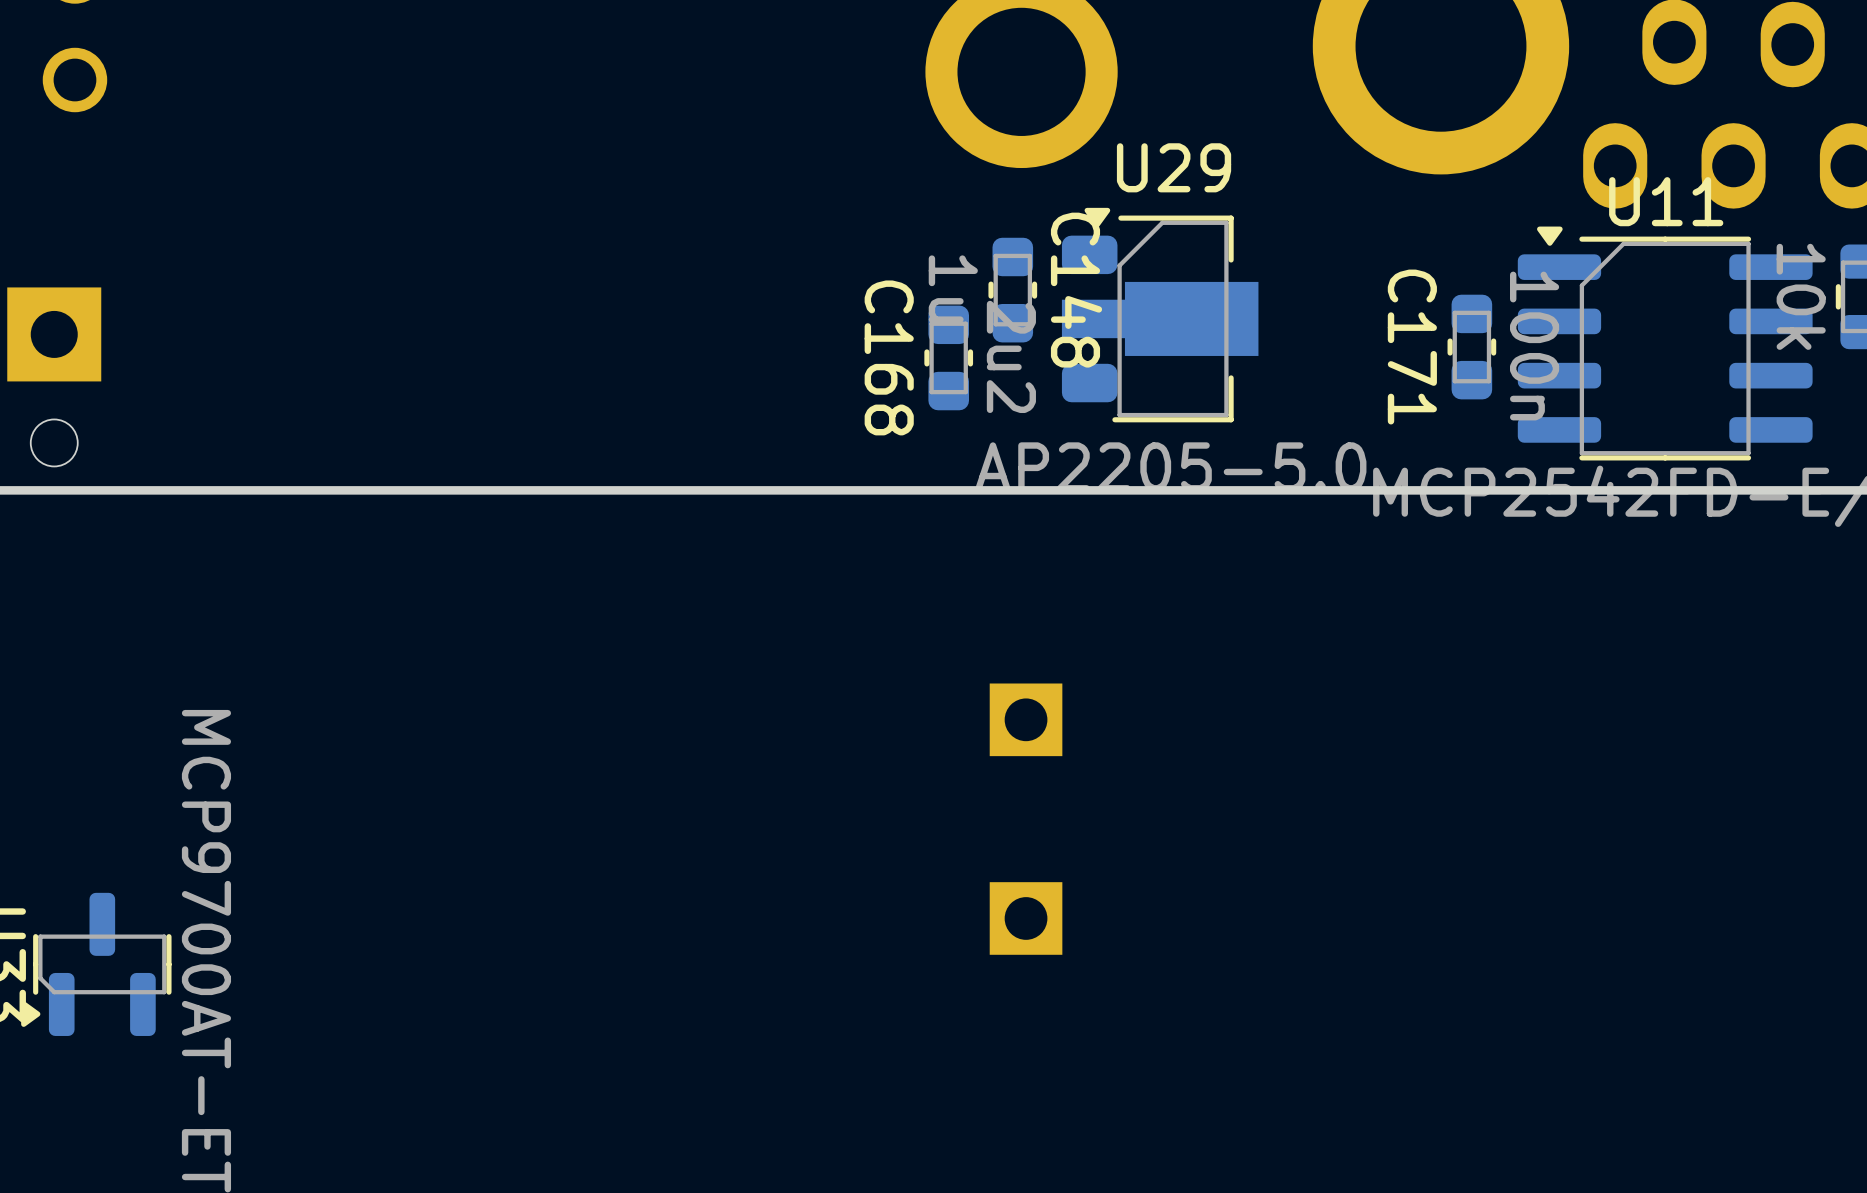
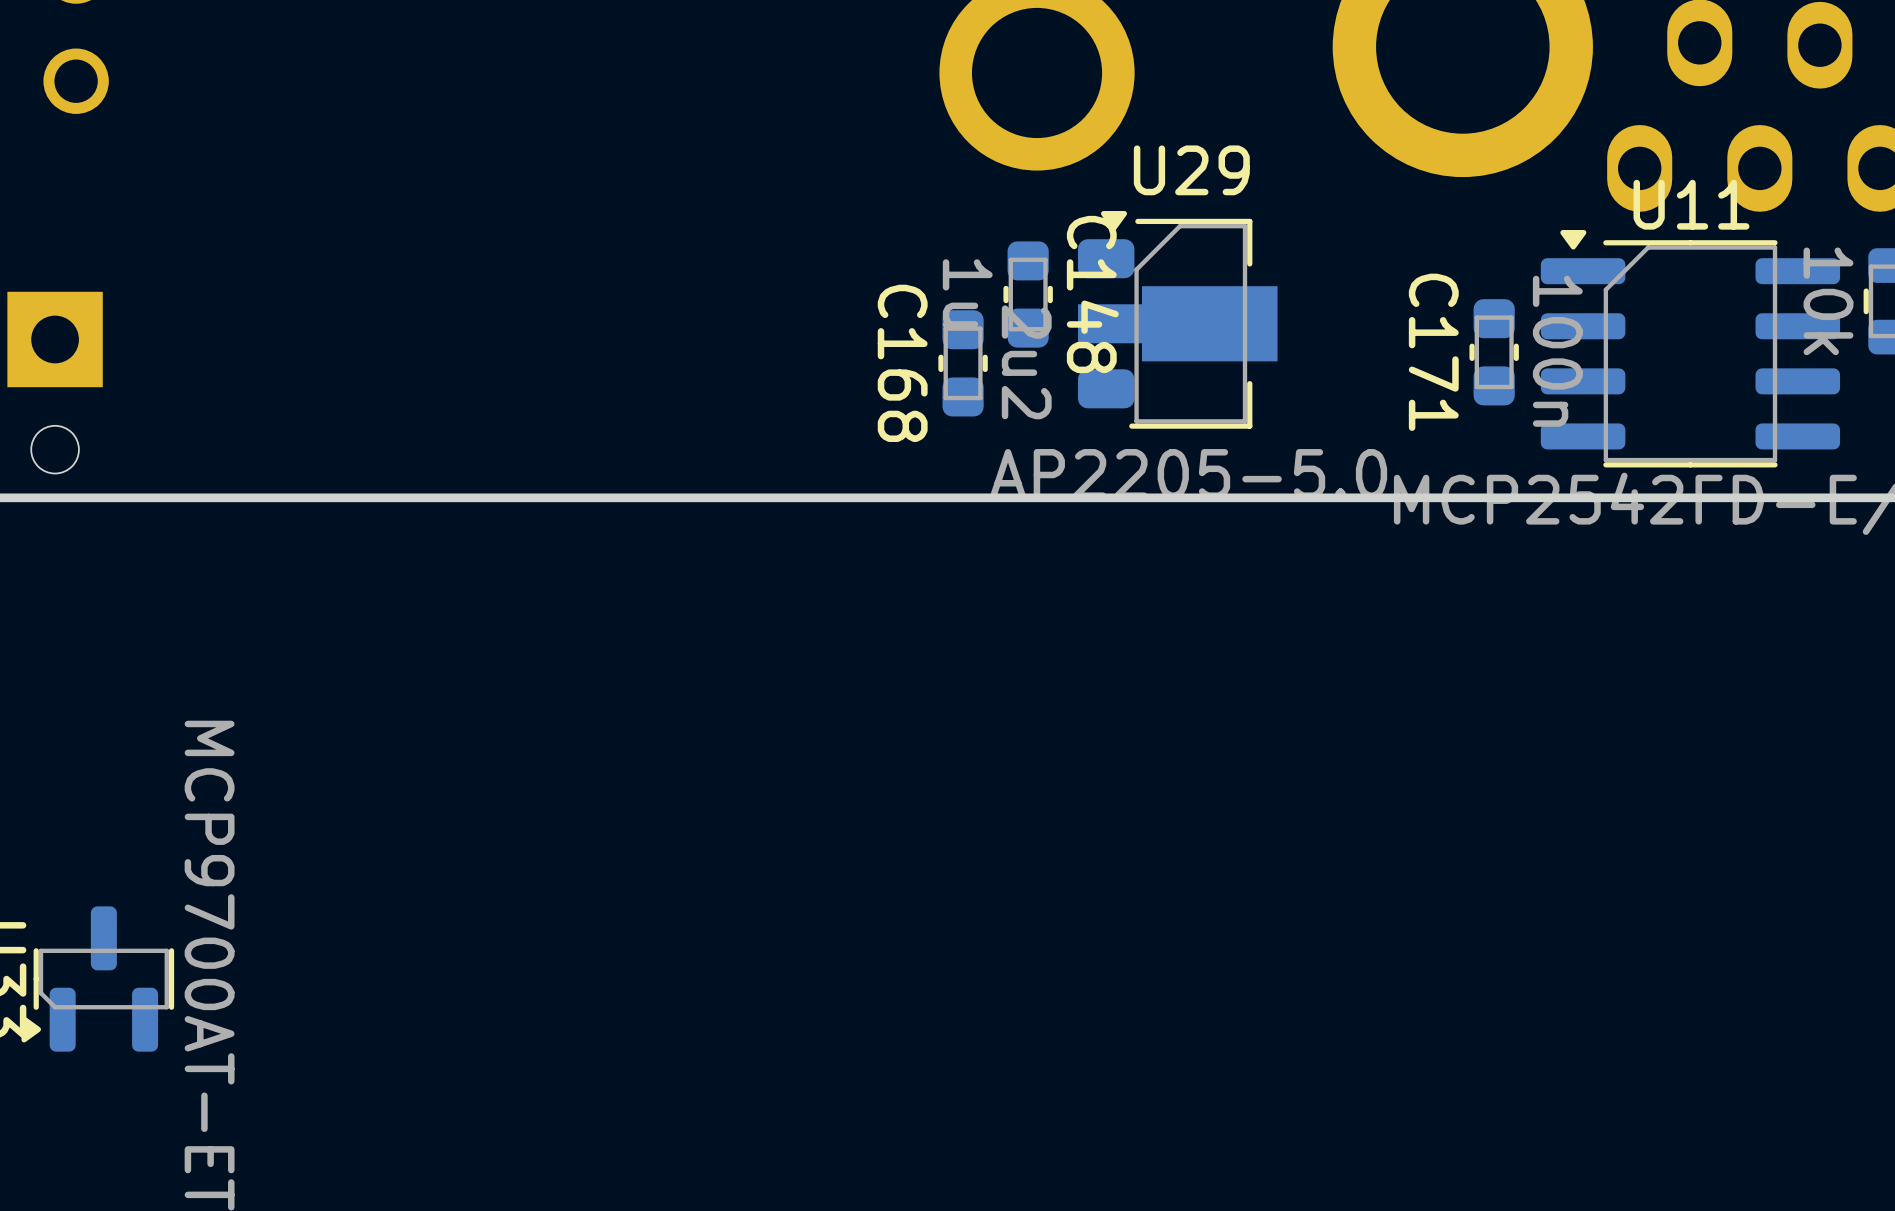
part: (1026, 719) -> none
part: (1026, 918) -> none

